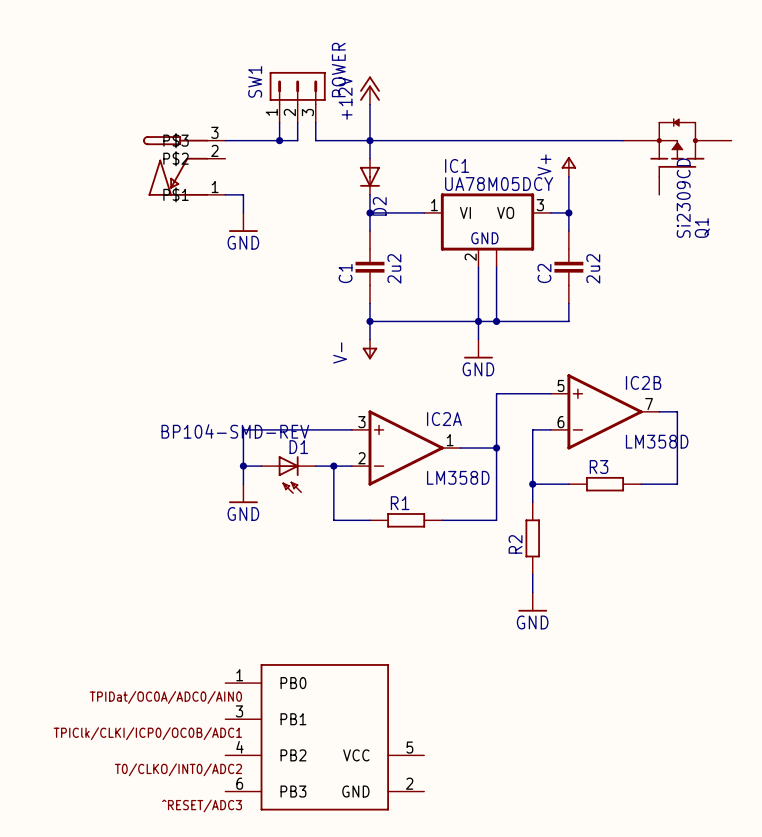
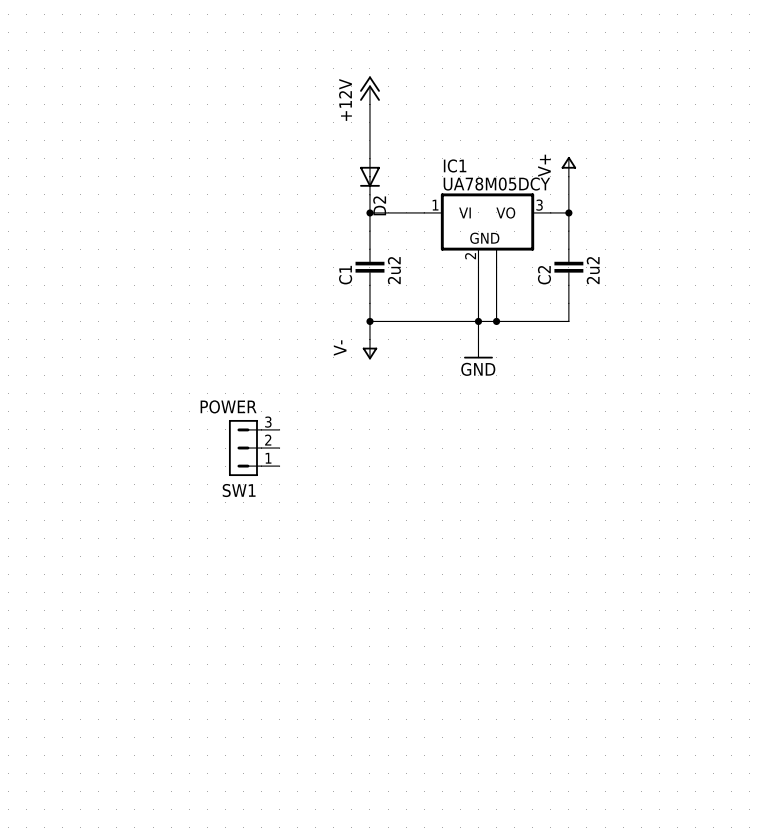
SW1 rotation: 0° (297, 88) -> 90° counterclockwise (245, 448)
SW1 position: (297, 97) -> (254, 448)
wire: (279, 122) (279, 140) -> none
wire: (297, 122) (297, 140) (225, 140) -> none
wire: (315, 122) (315, 140) (623, 140) -> none
junction: (279, 140) -> none
junction: (369, 140) -> none
Q1: Si2309CD (677, 156) -> none
part: (184, 165) -> none
wire: (225, 194) (243, 194) (243, 212) -> none
power symbol: GND (243, 222) -> none
wire: (550, 393) (496, 393) (496, 520) (442, 520) -> none
IC2B: LM358D (605, 411) -> none
wire: (659, 411) (677, 411) (677, 484) (641, 484) -> none
wire: (351, 429) (243, 429) (243, 484) -> none
wire: (550, 429) (532, 429) (532, 502) -> none
IC2A: LM358D (406, 448) -> none
wire: (460, 448) (496, 448) -> none
junction: (496, 448) -> none
junction: (243, 466) -> none
wire: (315, 466) (351, 466) -> none
wire: (333, 466) (333, 520) (369, 520) -> none
junction: (333, 466) -> none
D1: BP104-SMD-REV (288, 474) -> none
wire: (532, 484) (568, 484) -> none
junction: (532, 484) -> none
R3: (605, 484) -> none
power symbol: GND (243, 493) -> none
R1: (406, 520) -> none
R2: (532, 538) -> none
wire: (532, 574) (532, 592) -> none
power symbol: GND (532, 602) -> none
part: (324, 737) -> none

